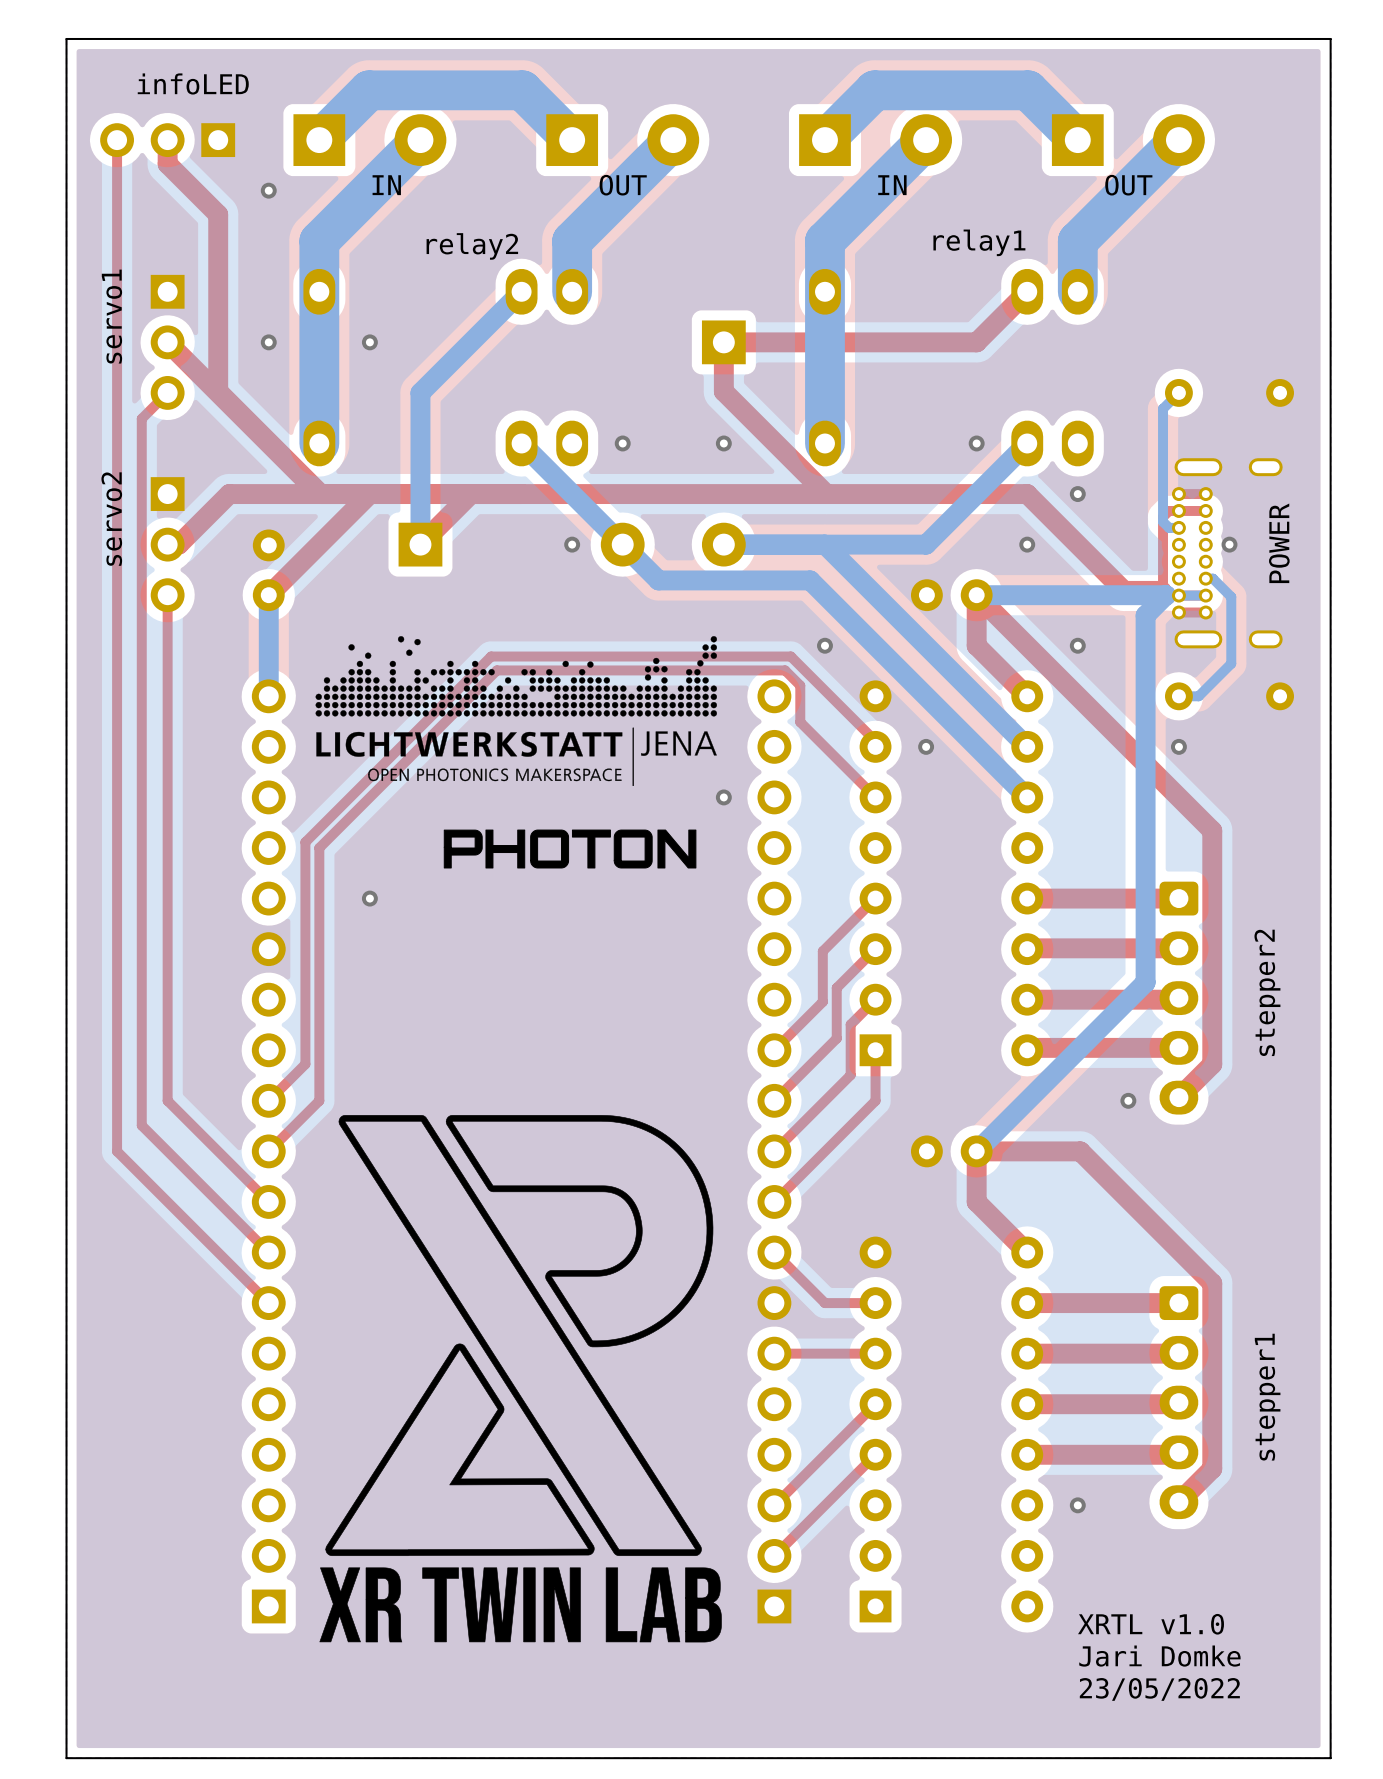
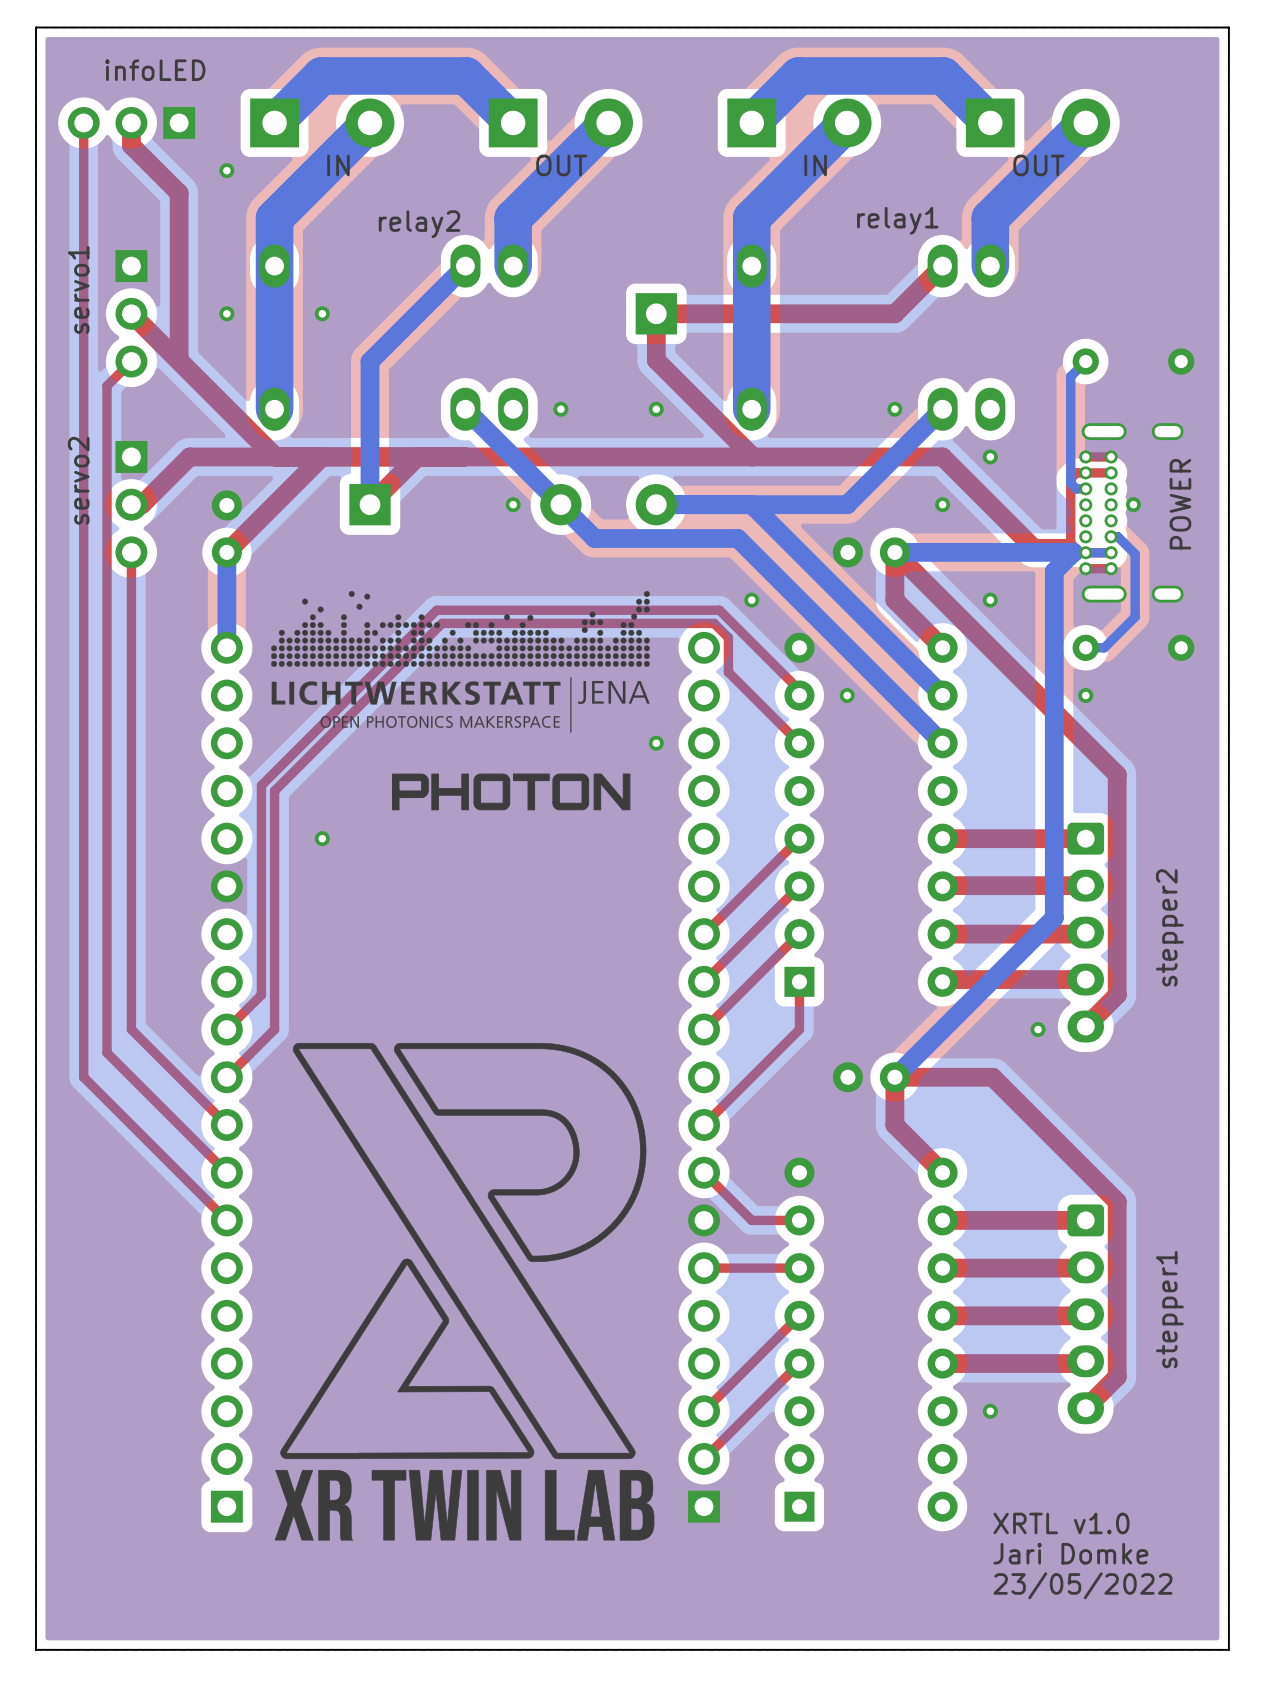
top track: (822, 951) (822, 1001) -> (762, 923) (749, 936)
top track: none -> (749, 888) (704, 934)
top track: (836, 987) (836, 1038) -> (775, 957) (762, 970)
top track: (850, 1024) (850, 1075) (774, 1151) -> none

